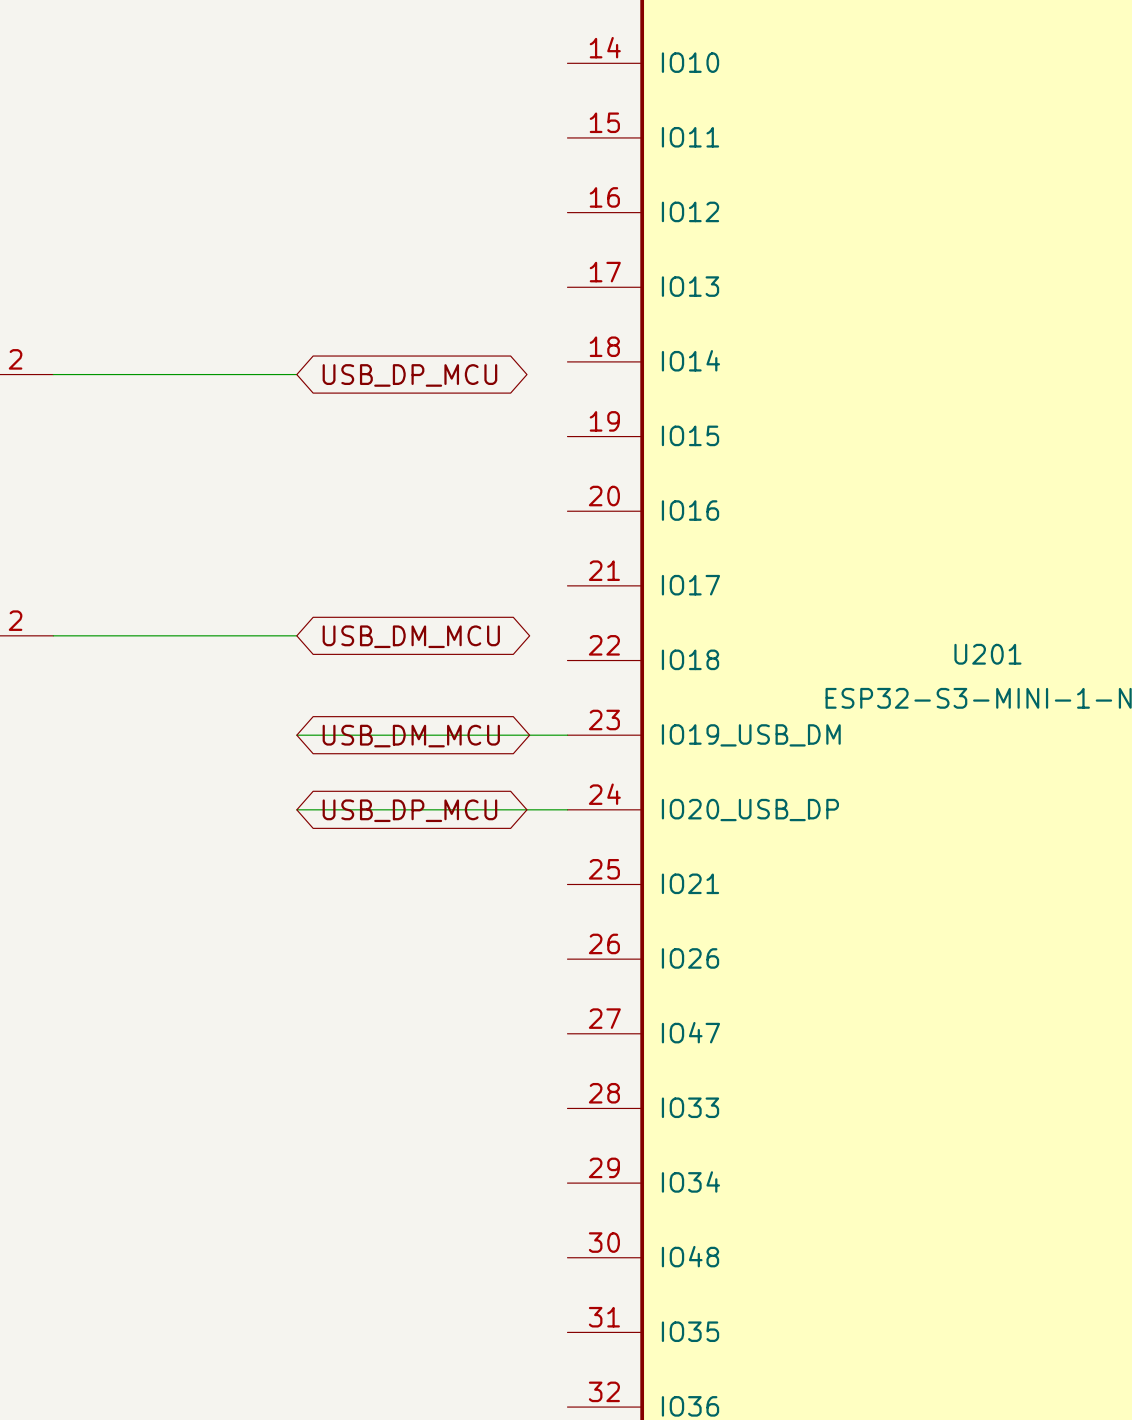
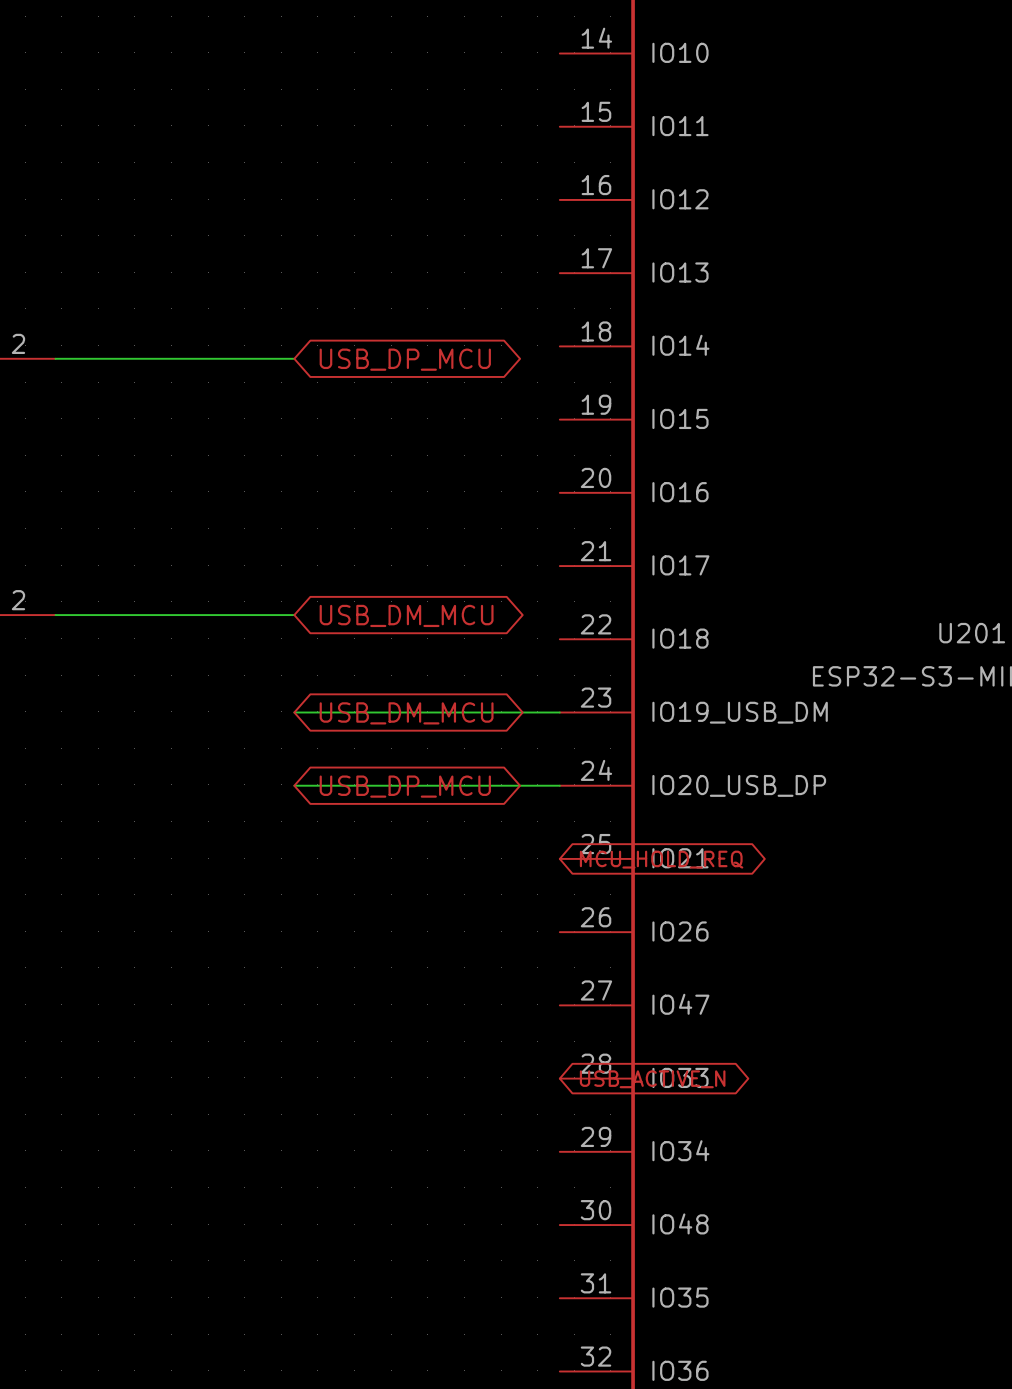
global label: none -> MCU_HOLD_REQ (661, 859)
global label: none -> USB_ACTIVE_N (652, 1079)

